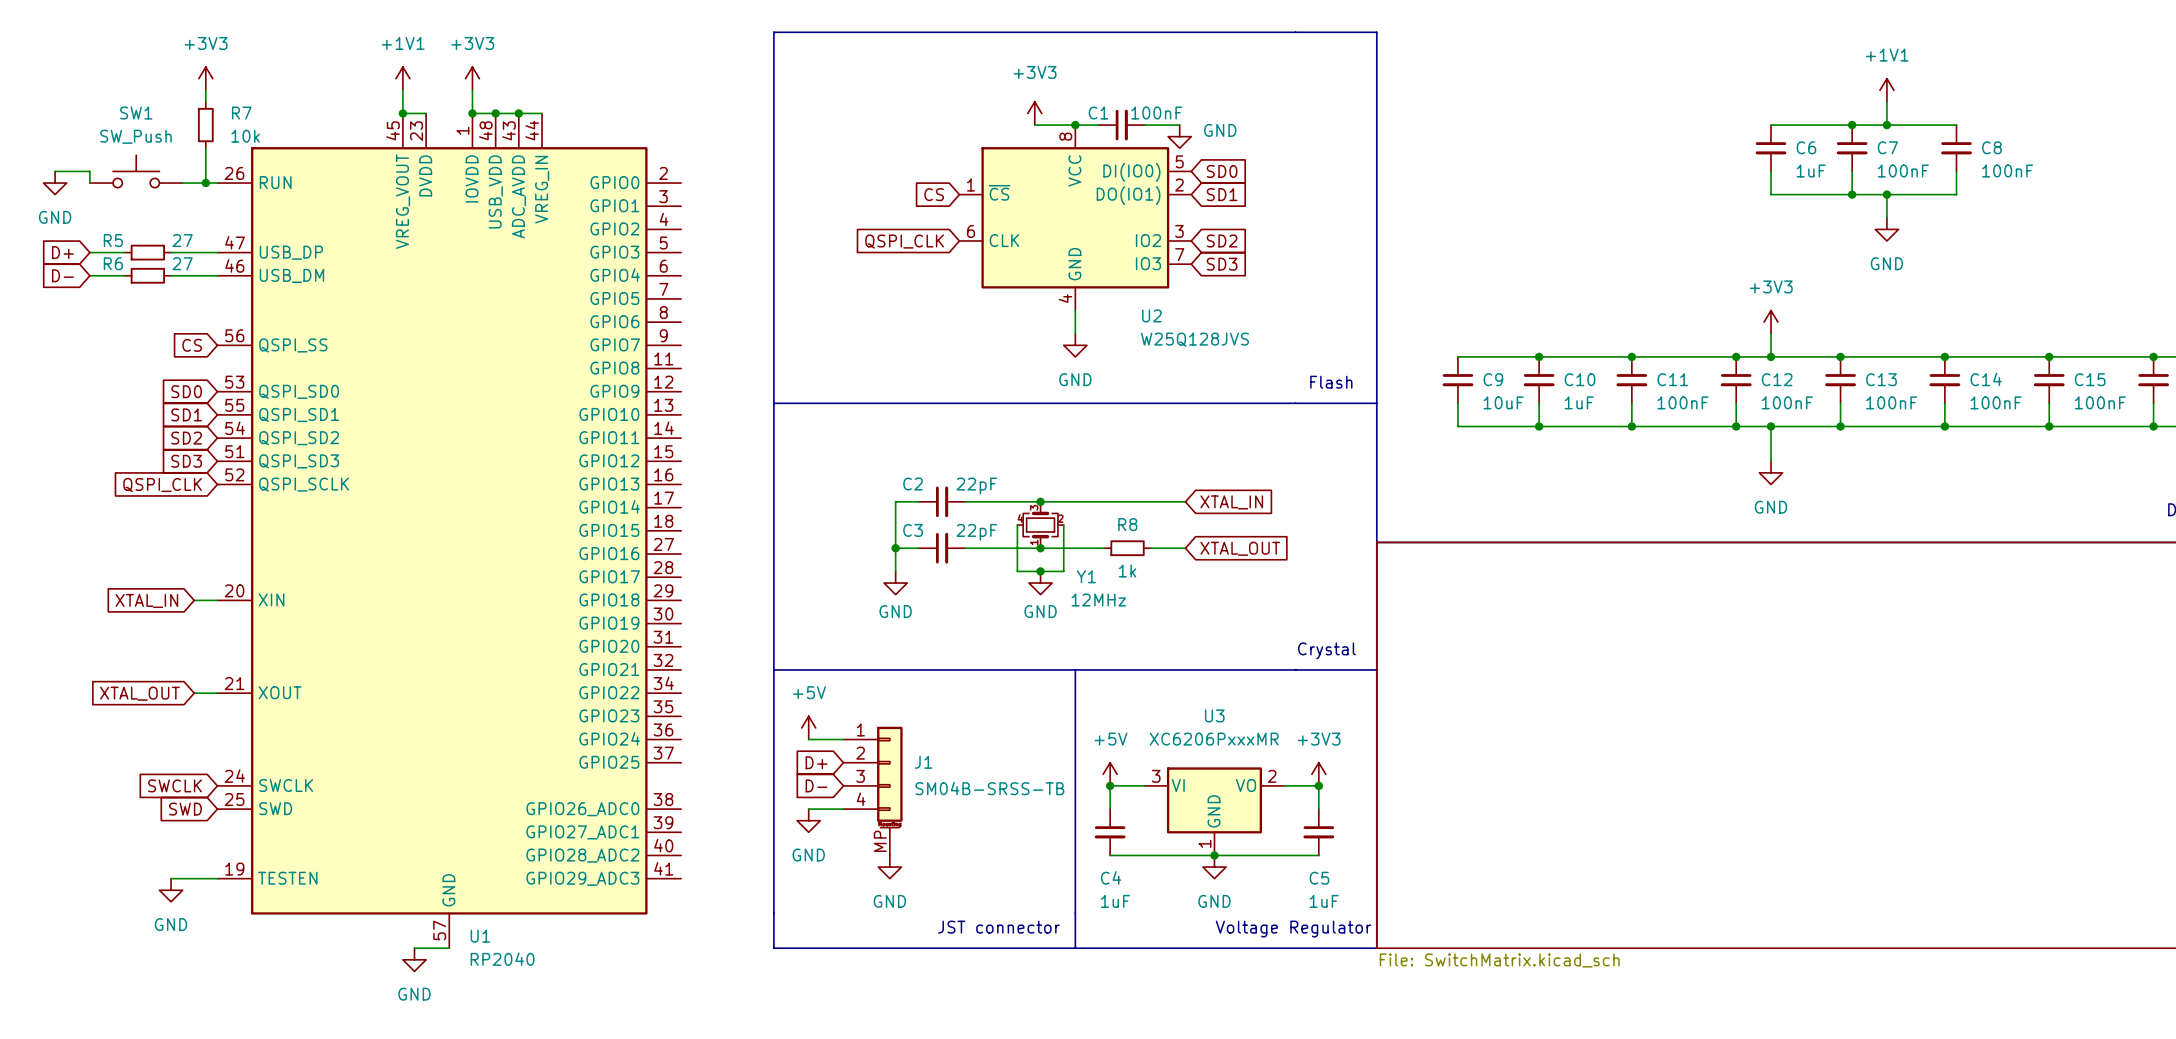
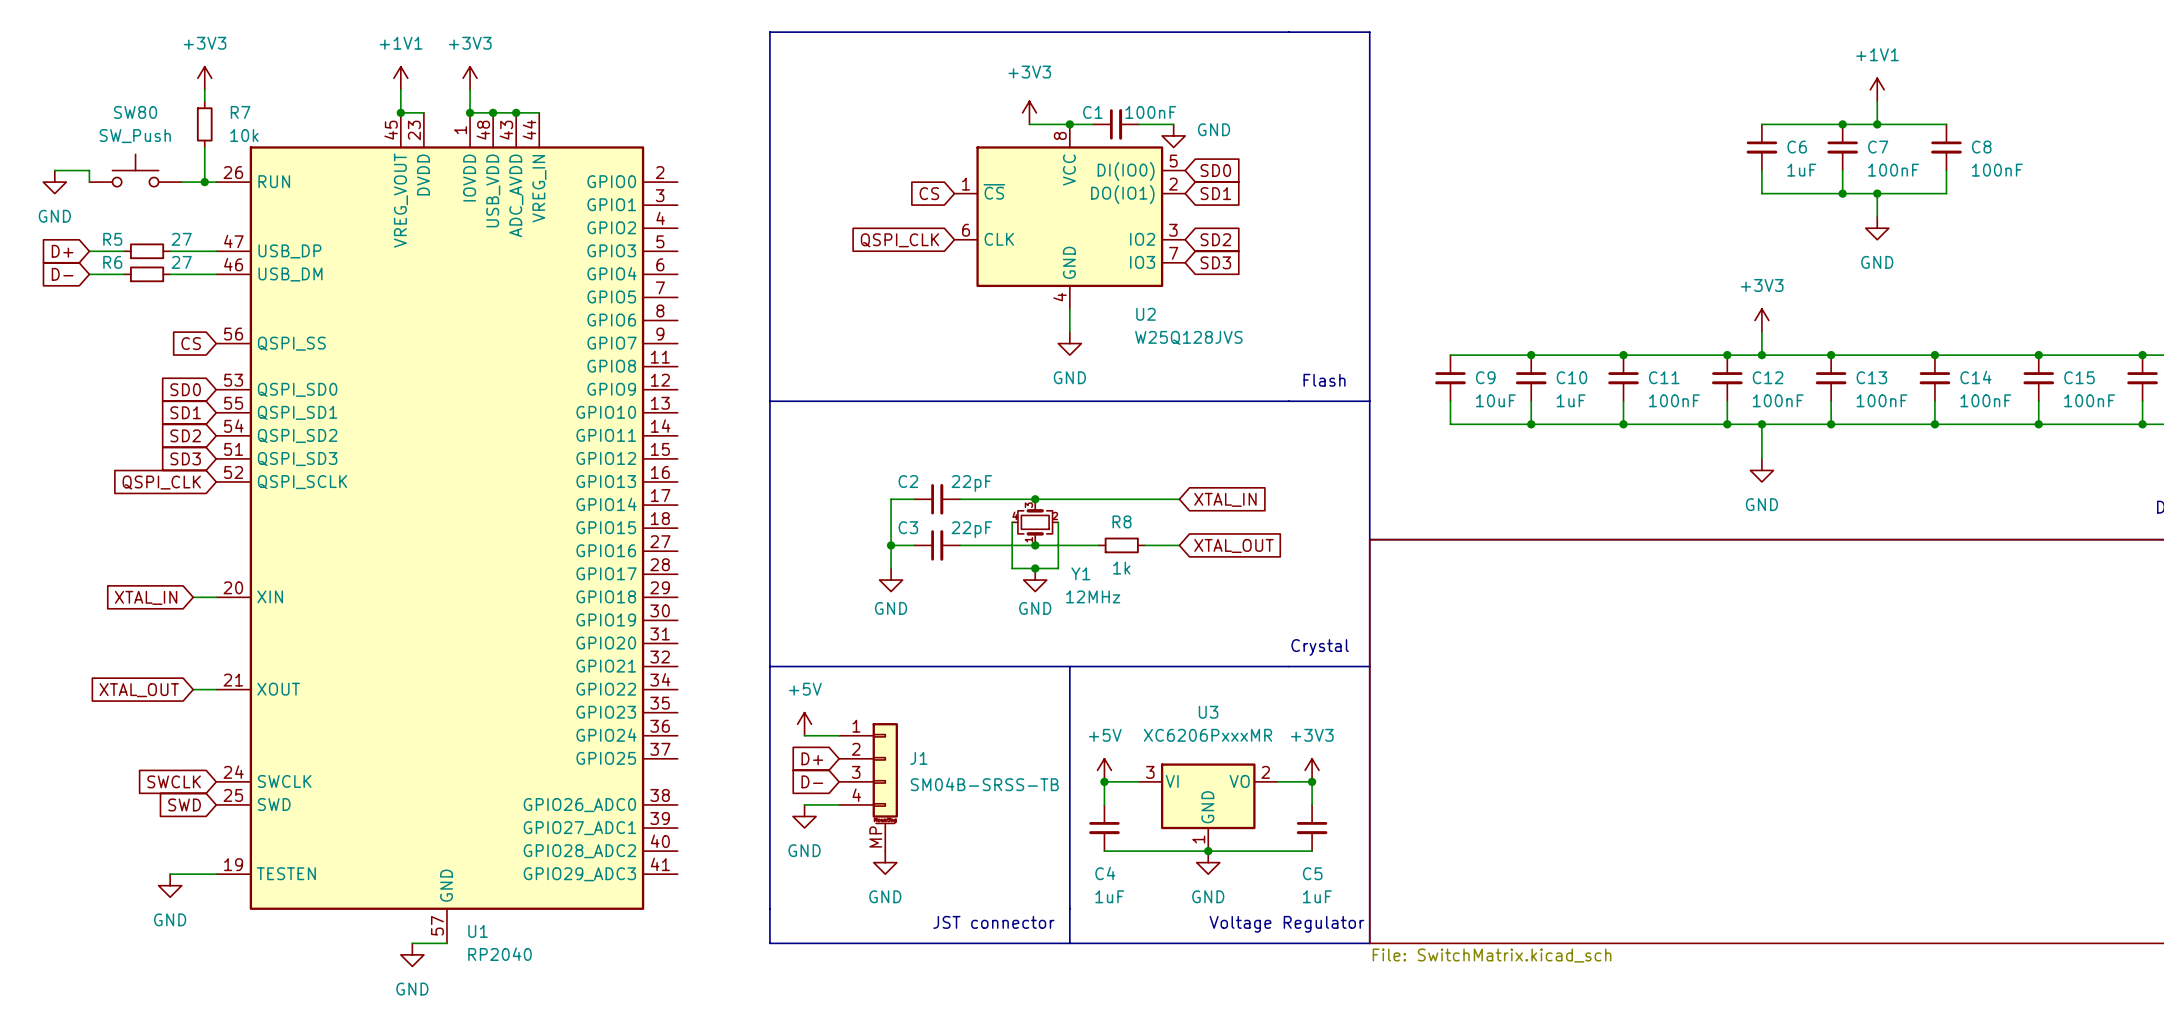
SW1 name: SW1 (136, 113) -> SW80 (135, 112)

